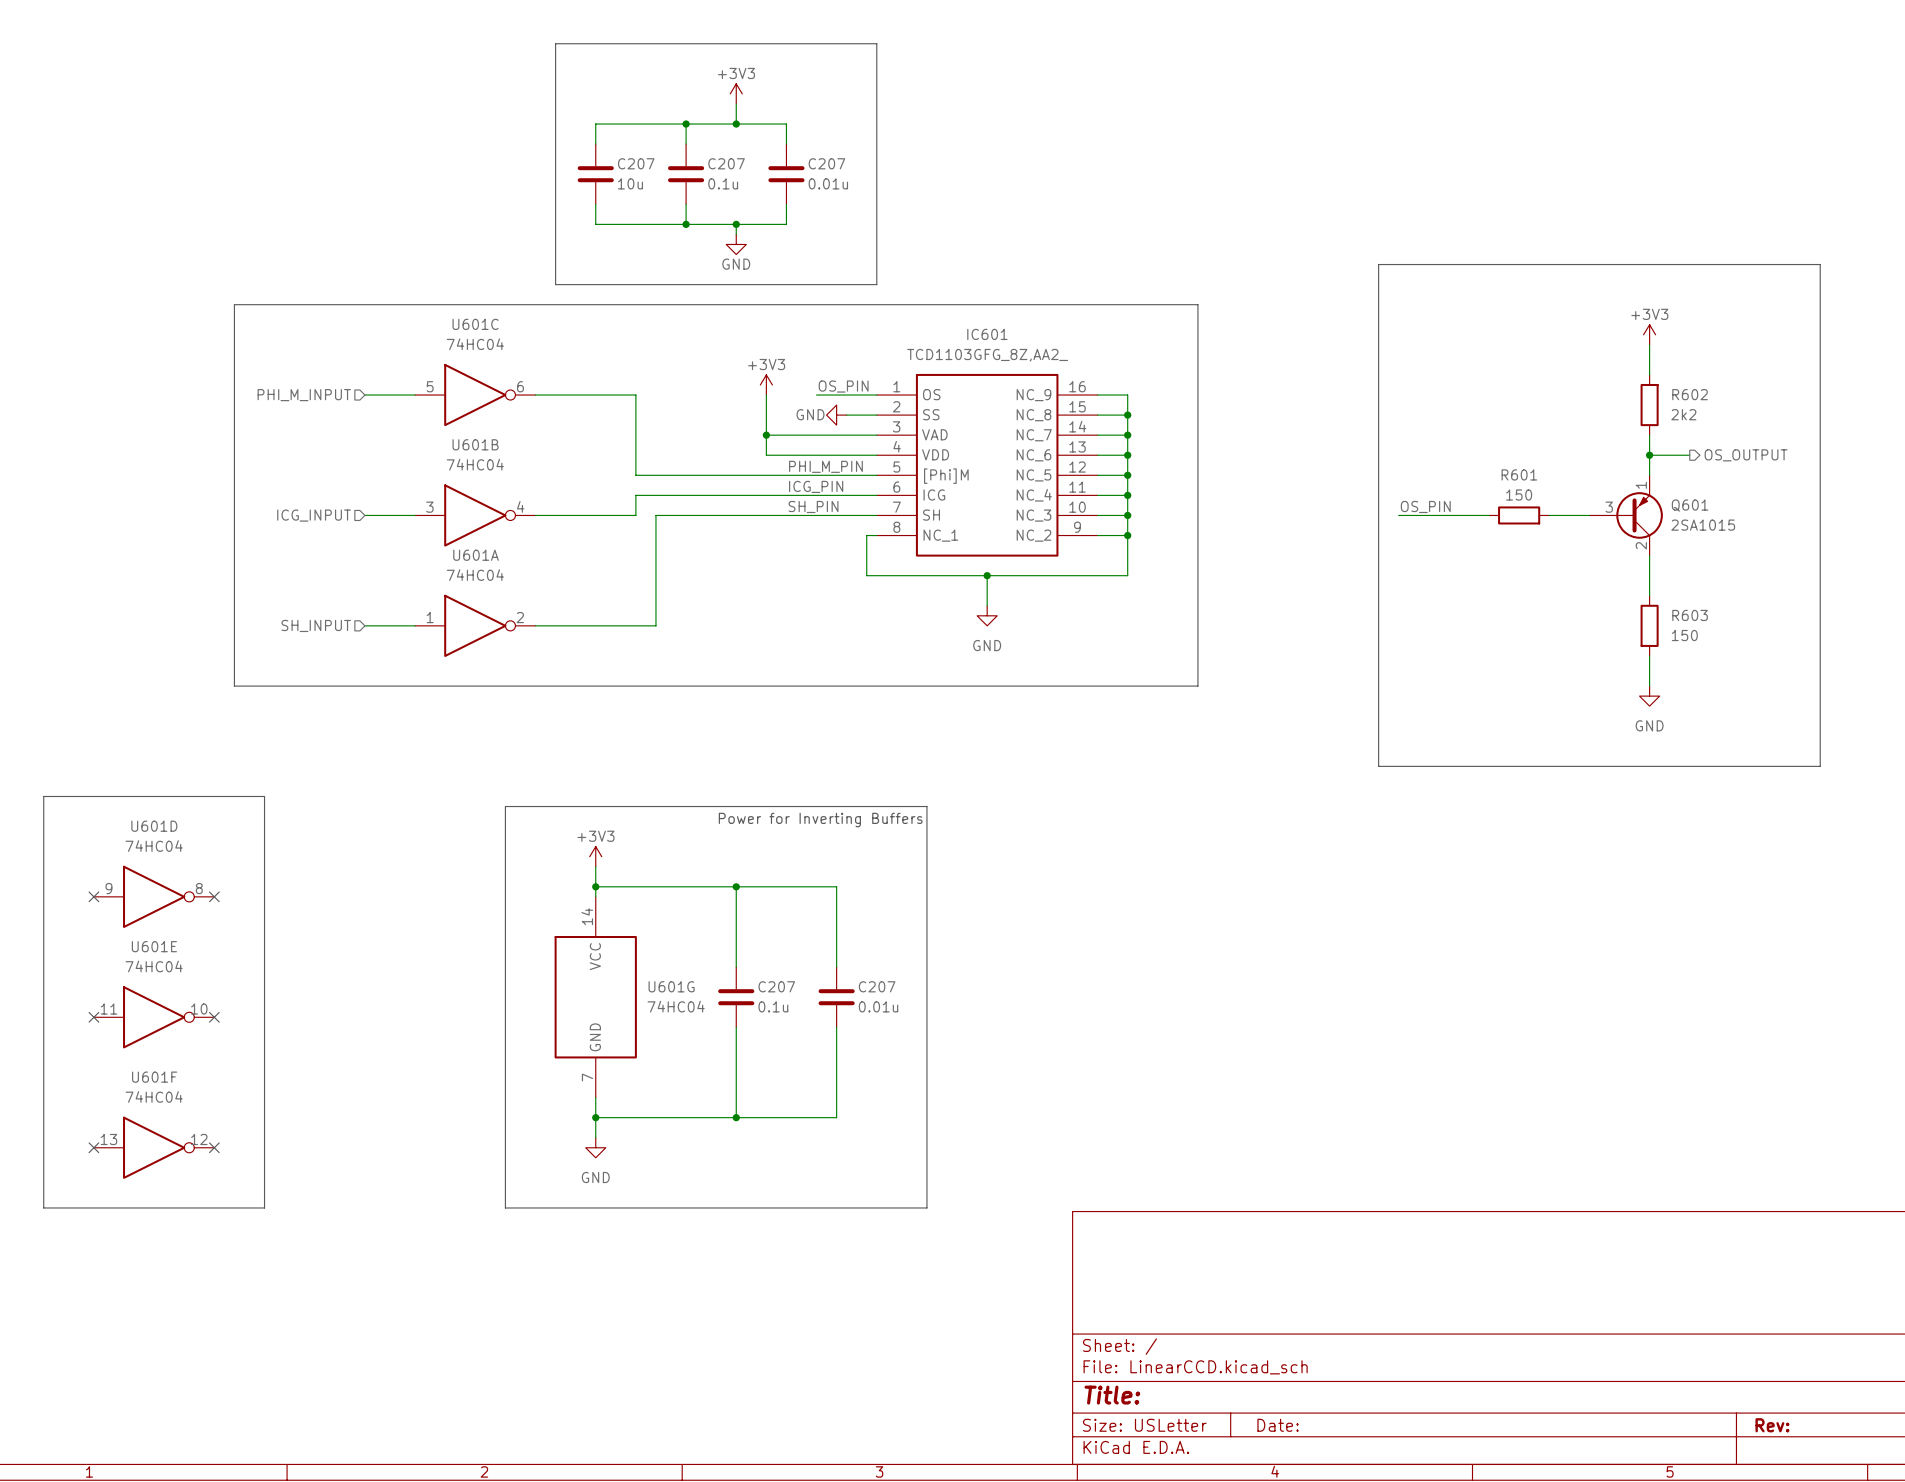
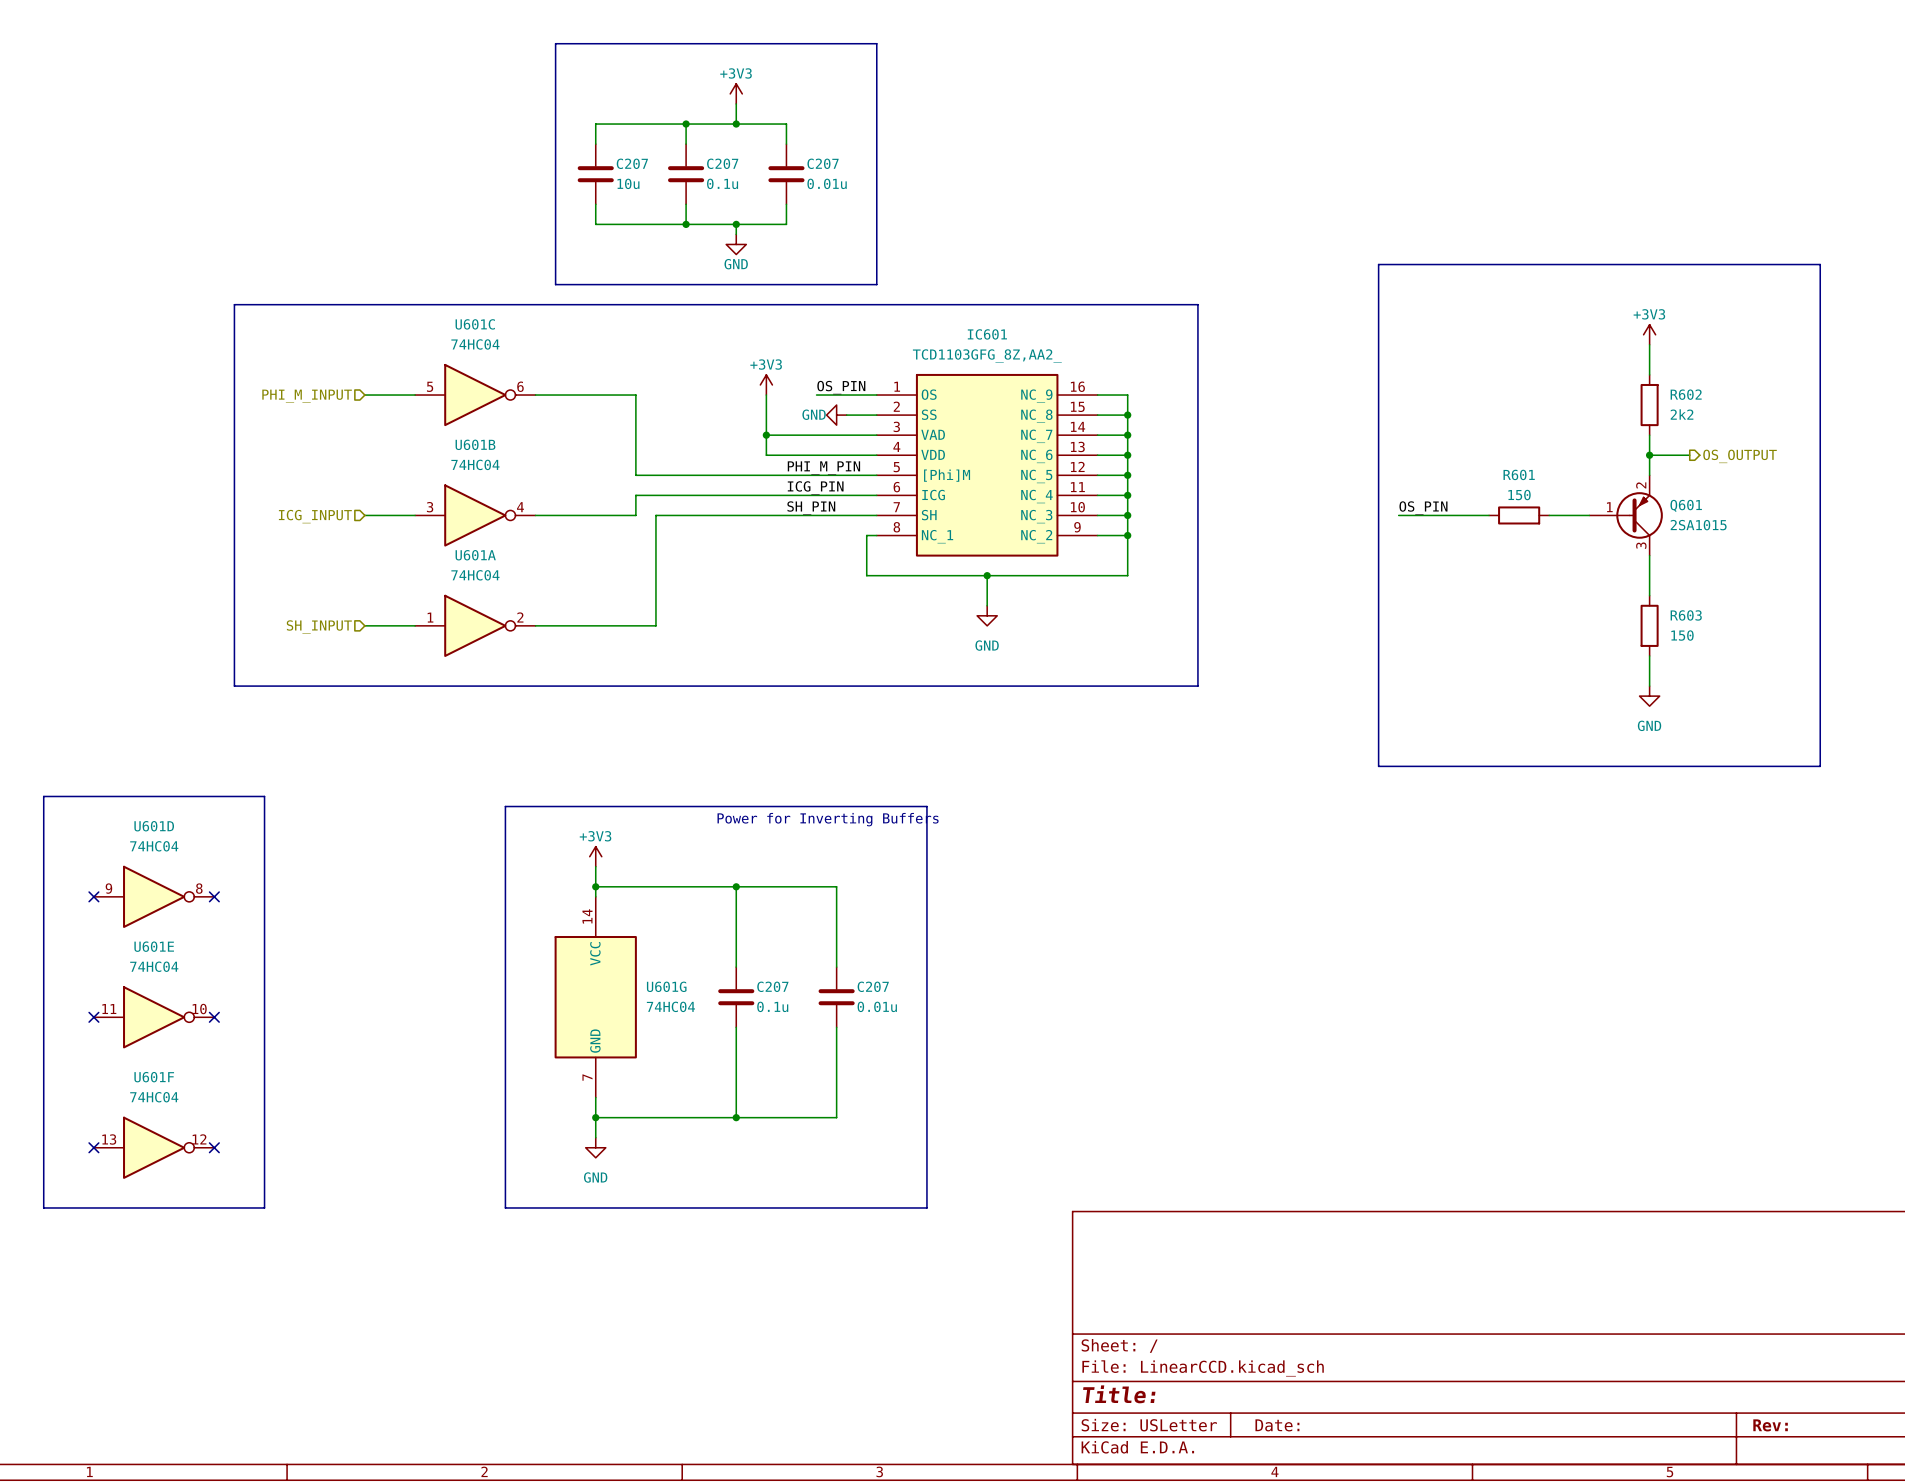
Q601 pin number: 1 (1641, 485) -> 2 (1641, 485)
Q601 pin number: 3 (1609, 507) -> 1 (1609, 507)
Q601 pin number: 2 (1641, 545) -> 3 (1641, 545)

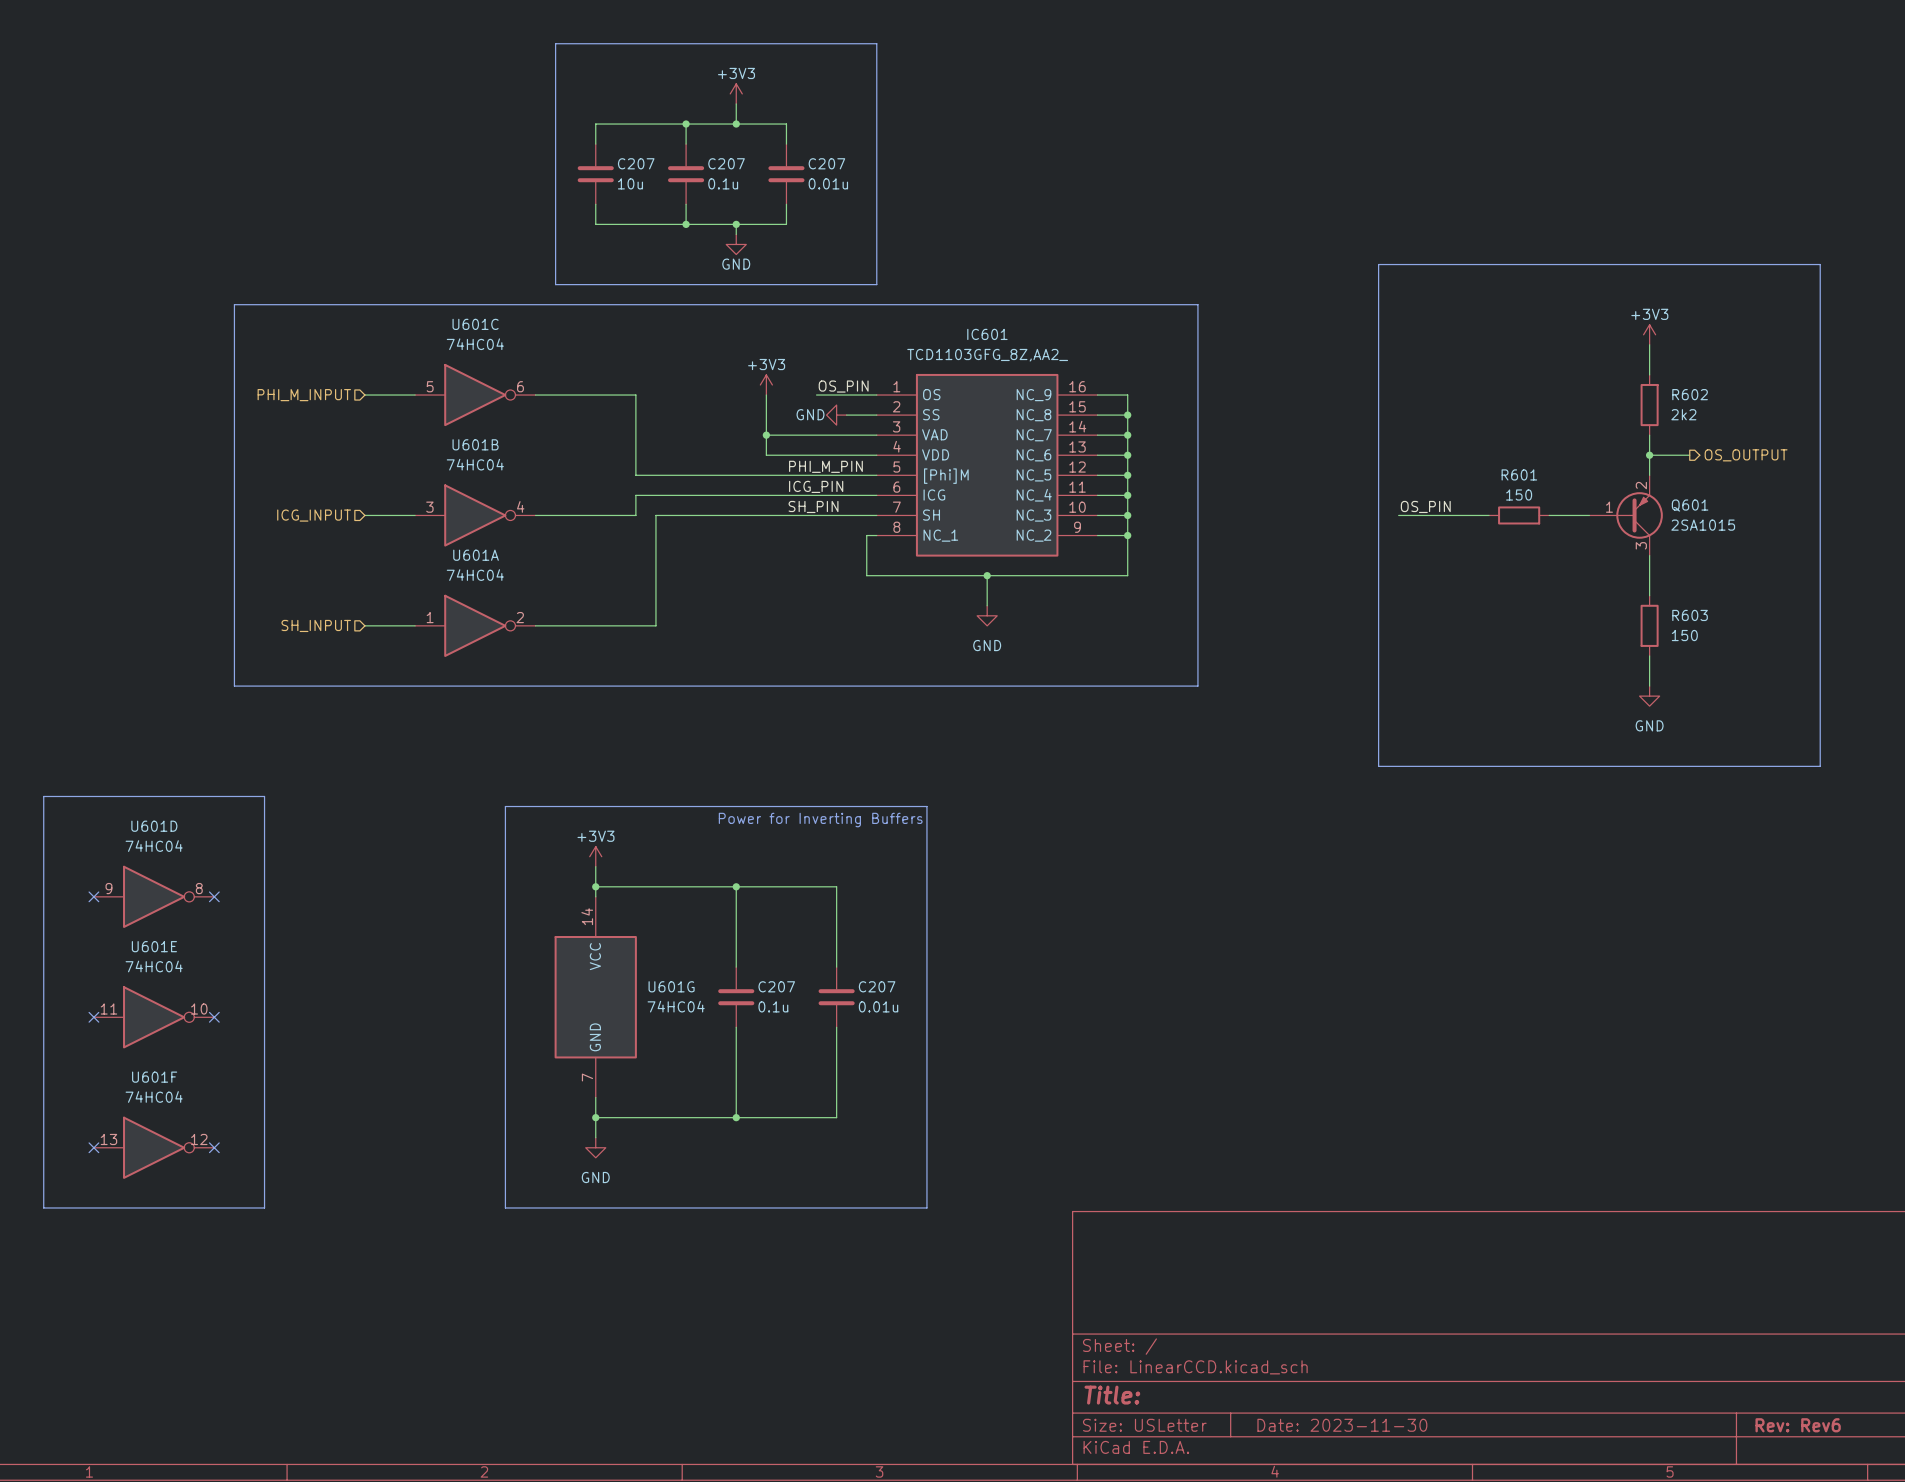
title block: Date: (1277, 1425) -> Date: 2023-11-30 (1342, 1425)
title block: Rev: (1770, 1425) -> Rev: Rev6 (1798, 1425)

